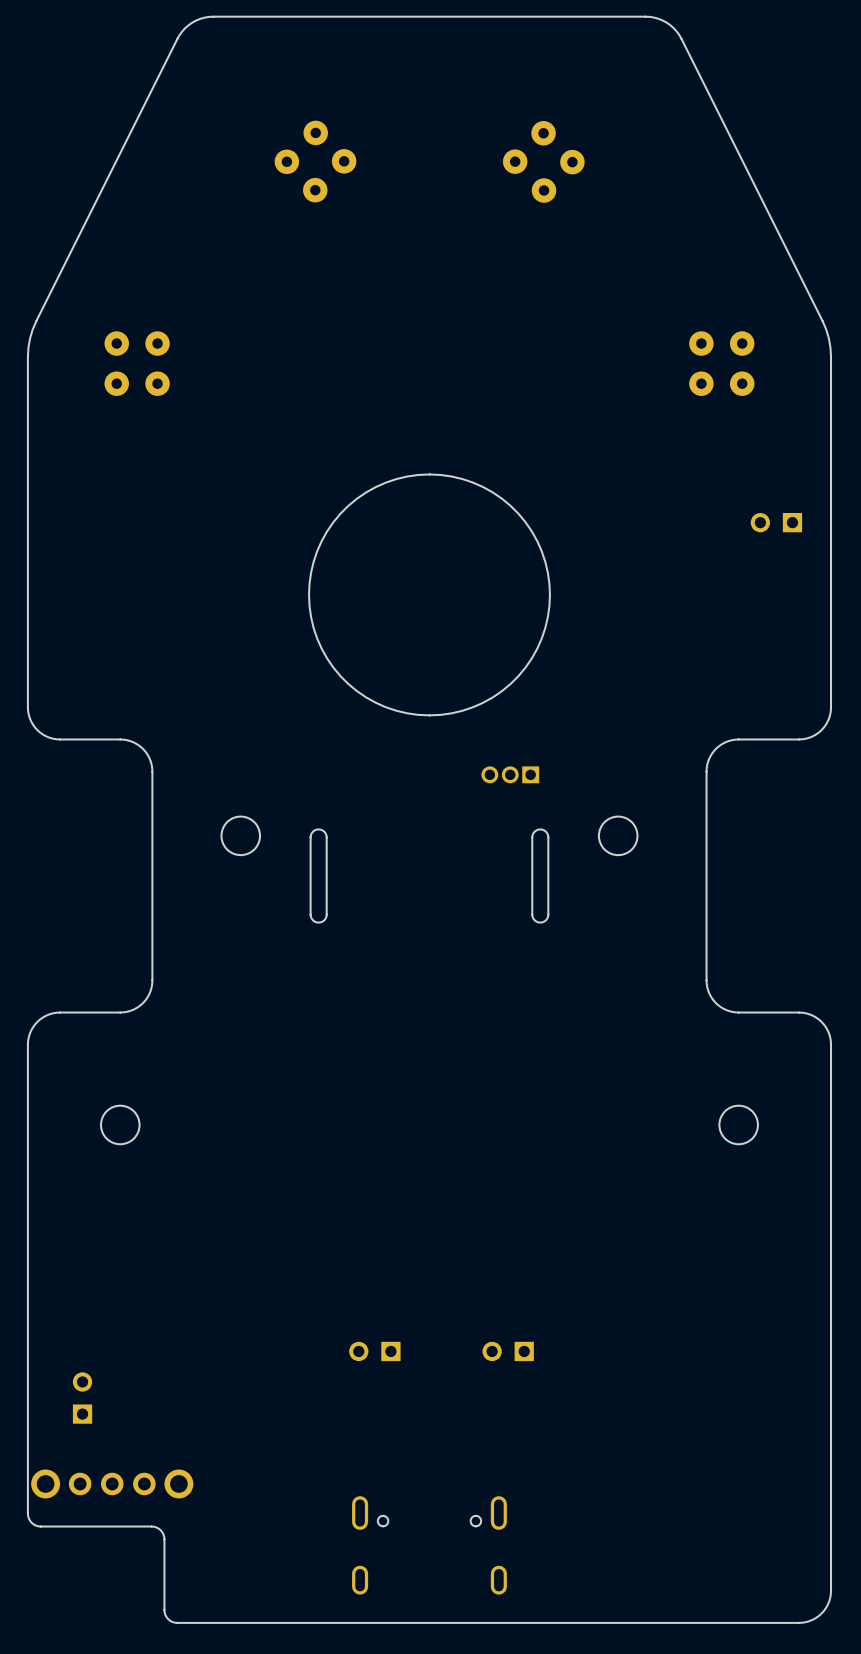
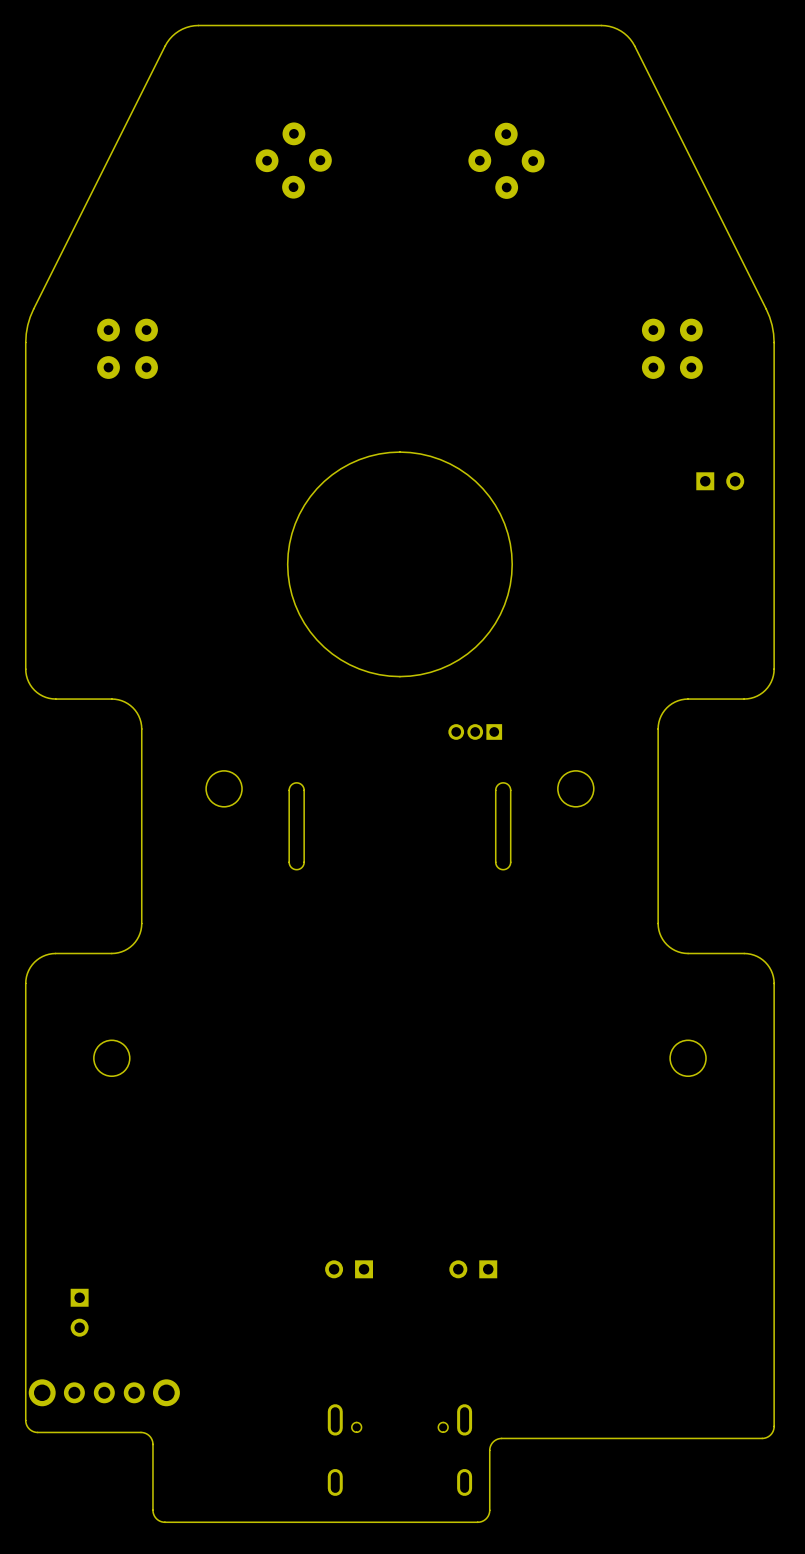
part rotation: 0° (776, 522) -> 180° (720, 481)
part rotation: 0° (82, 1398) -> 180° (79, 1312)
board edge: (831, 1520) (830, 1597) (821, 1613) (809, 1621) (798, 1622) (513, 1622) -> (774, 1426) (770, 1434) (762, 1438) (498, 1438) (493, 1441) (489, 1448) (489, 1513) (485, 1519) (477, 1522)

